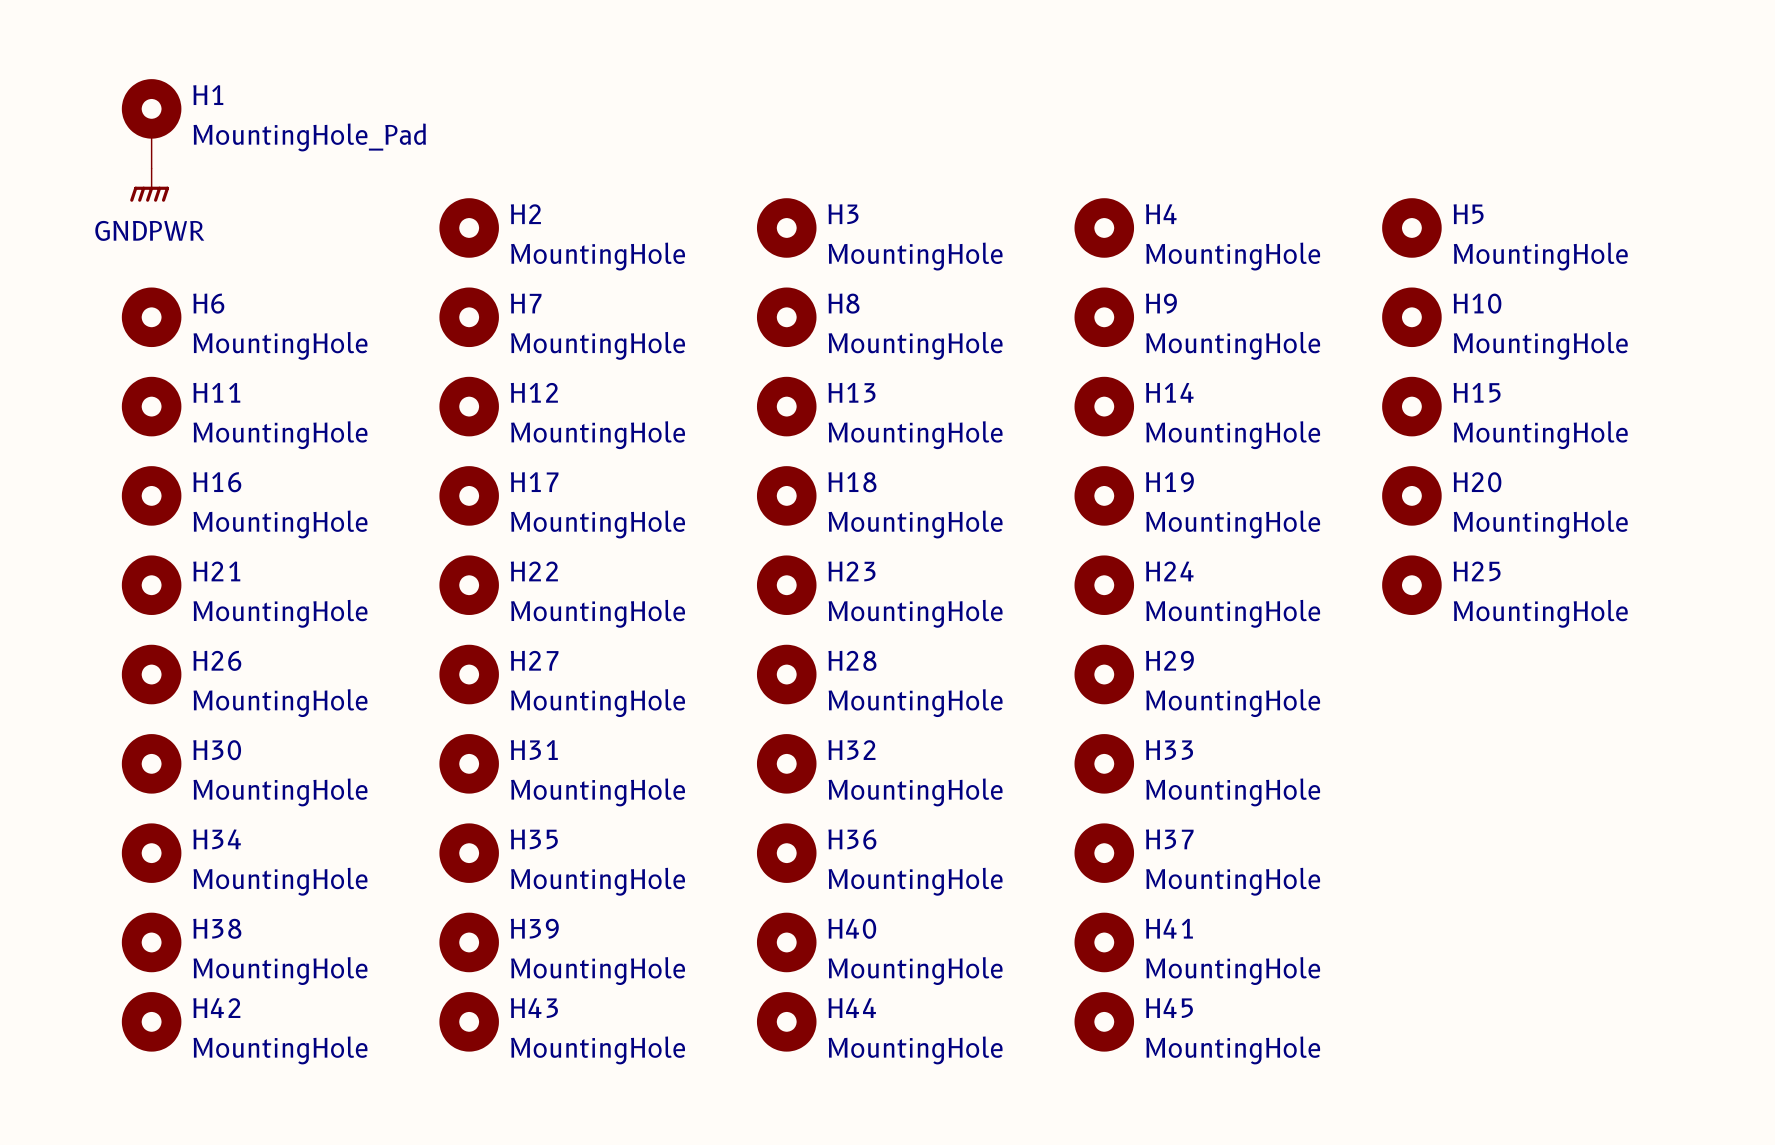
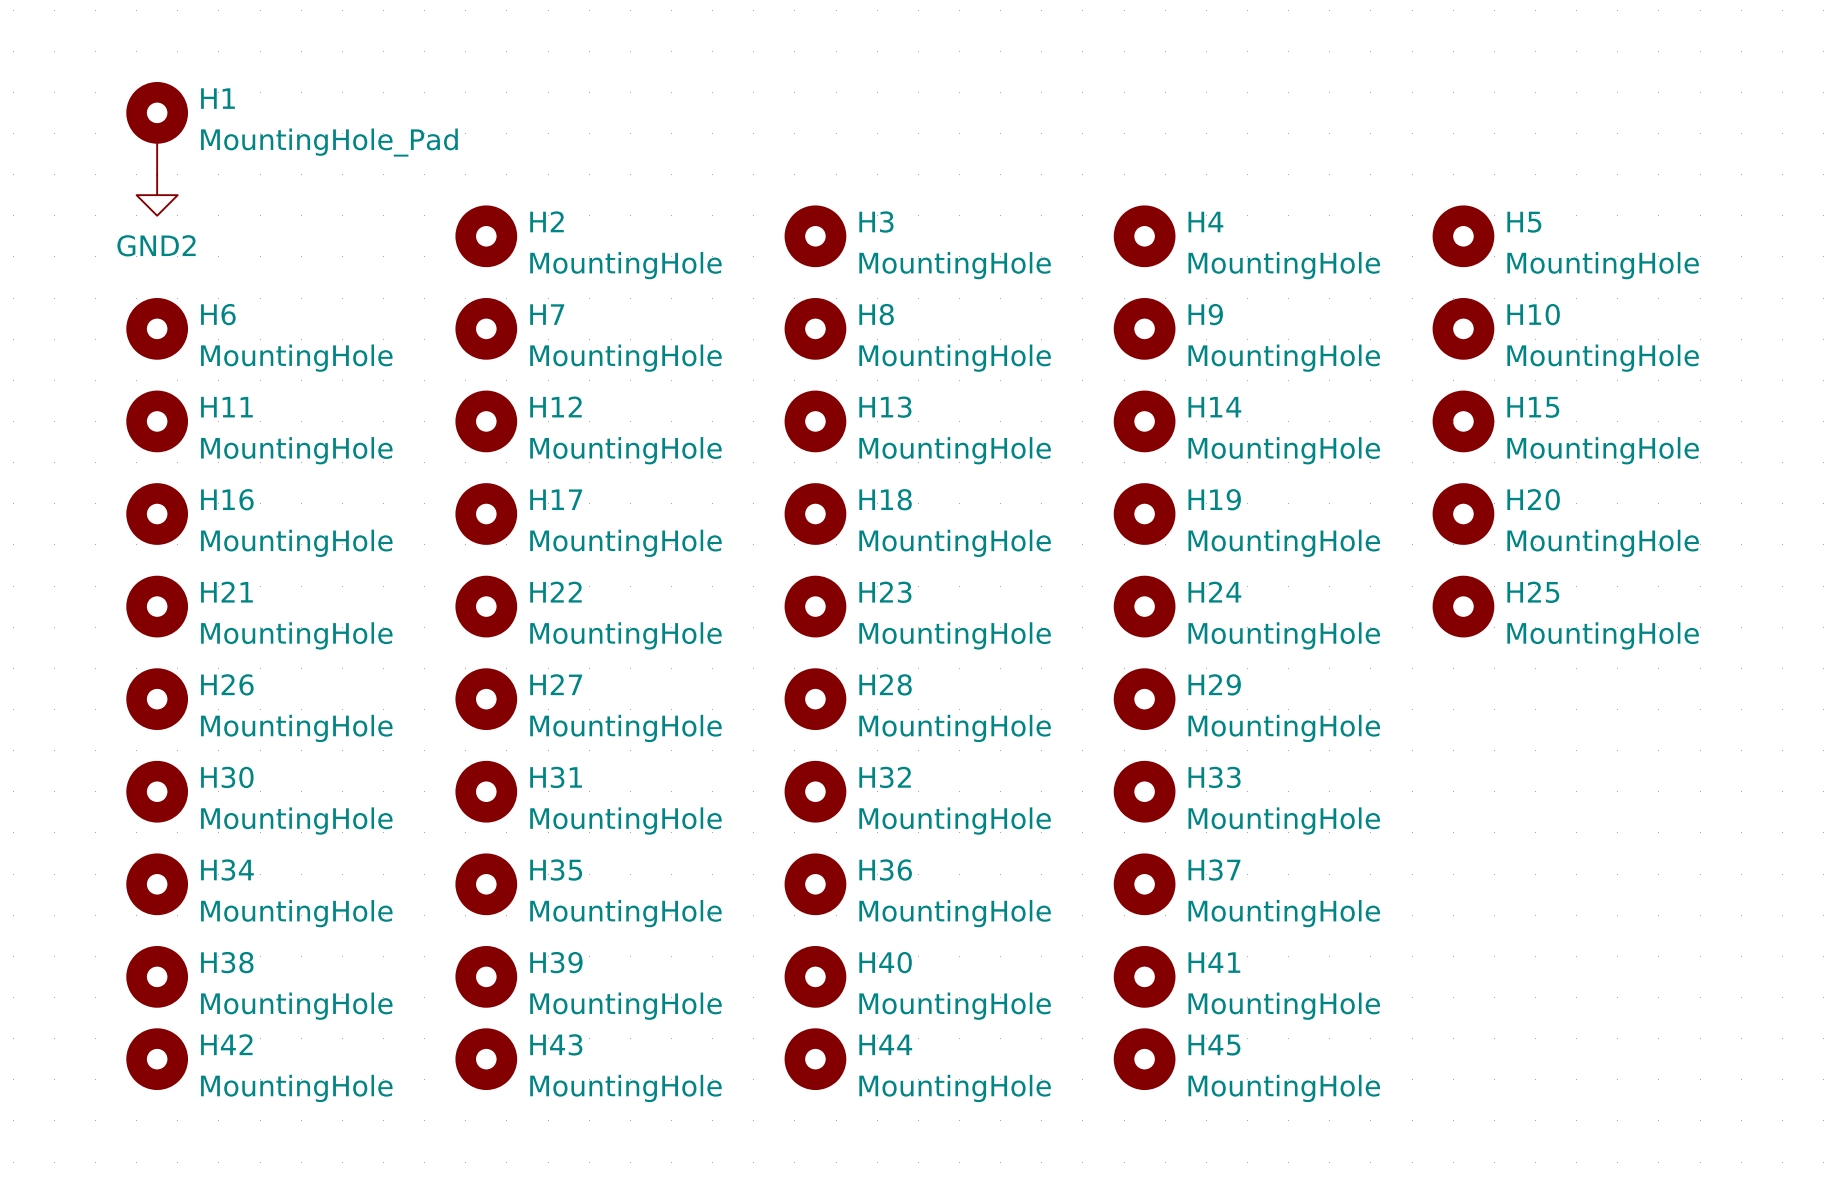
power symbol: GNDPWR (149, 185) -> GND2 (157, 195)

